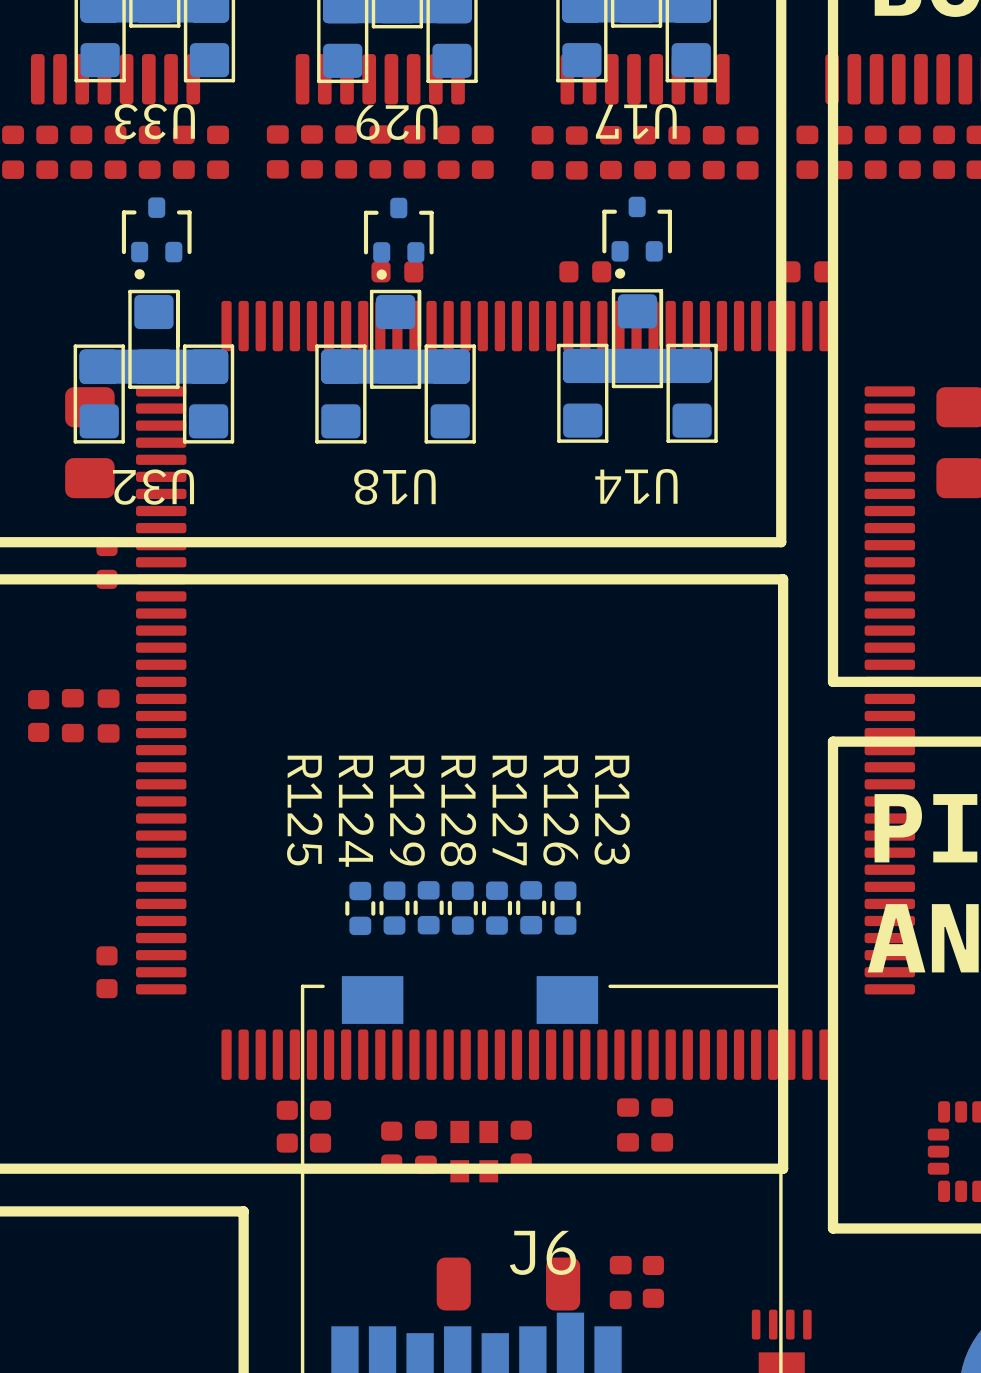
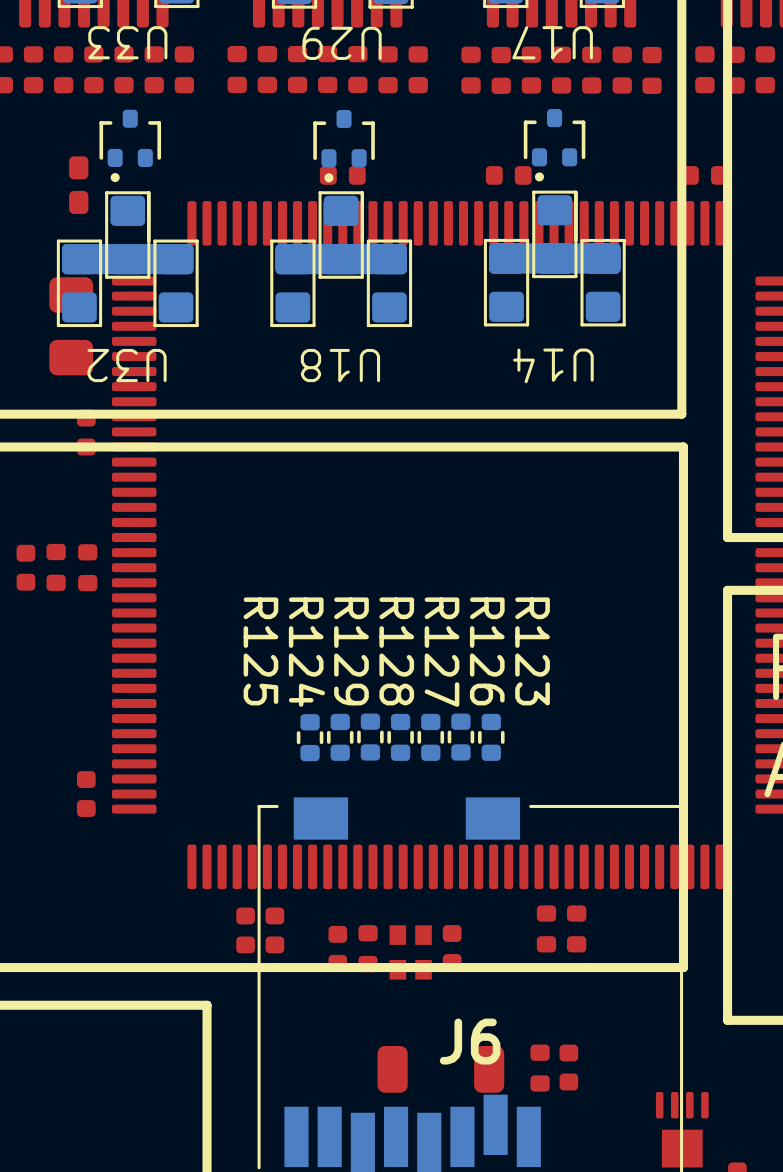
part: none -> (78, 185)

